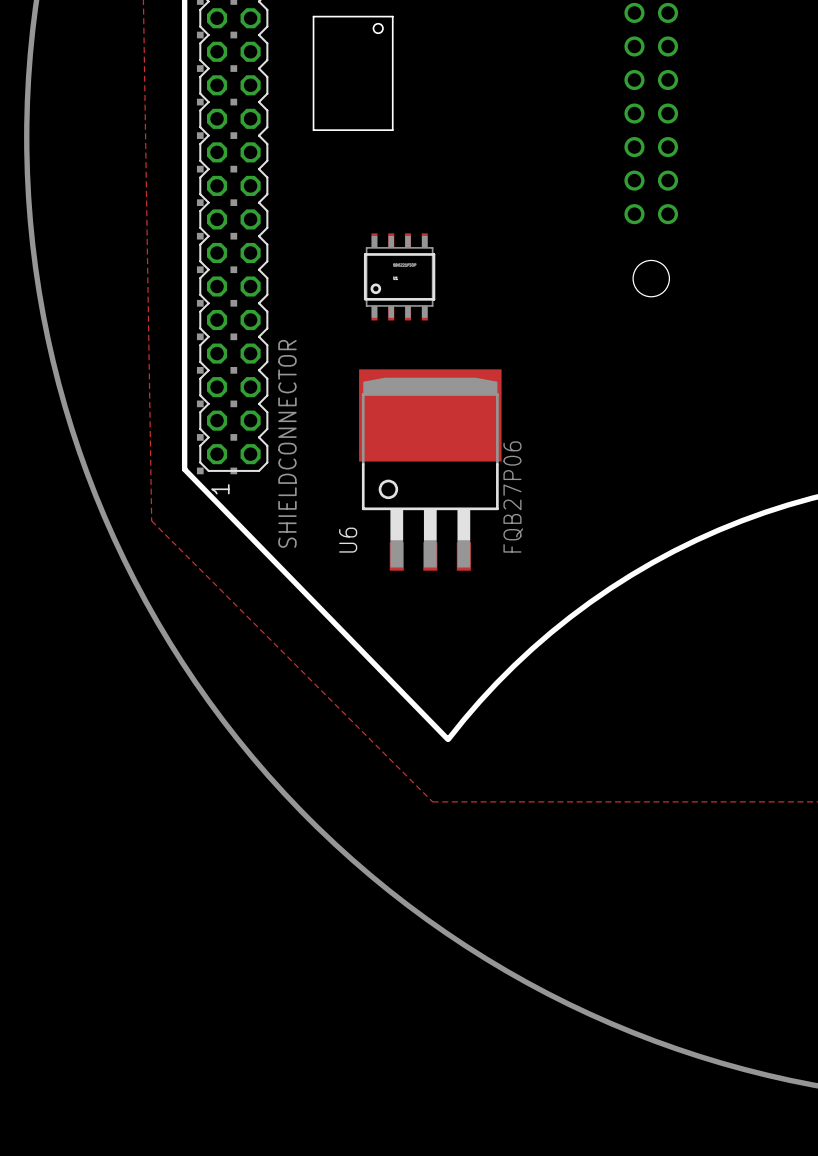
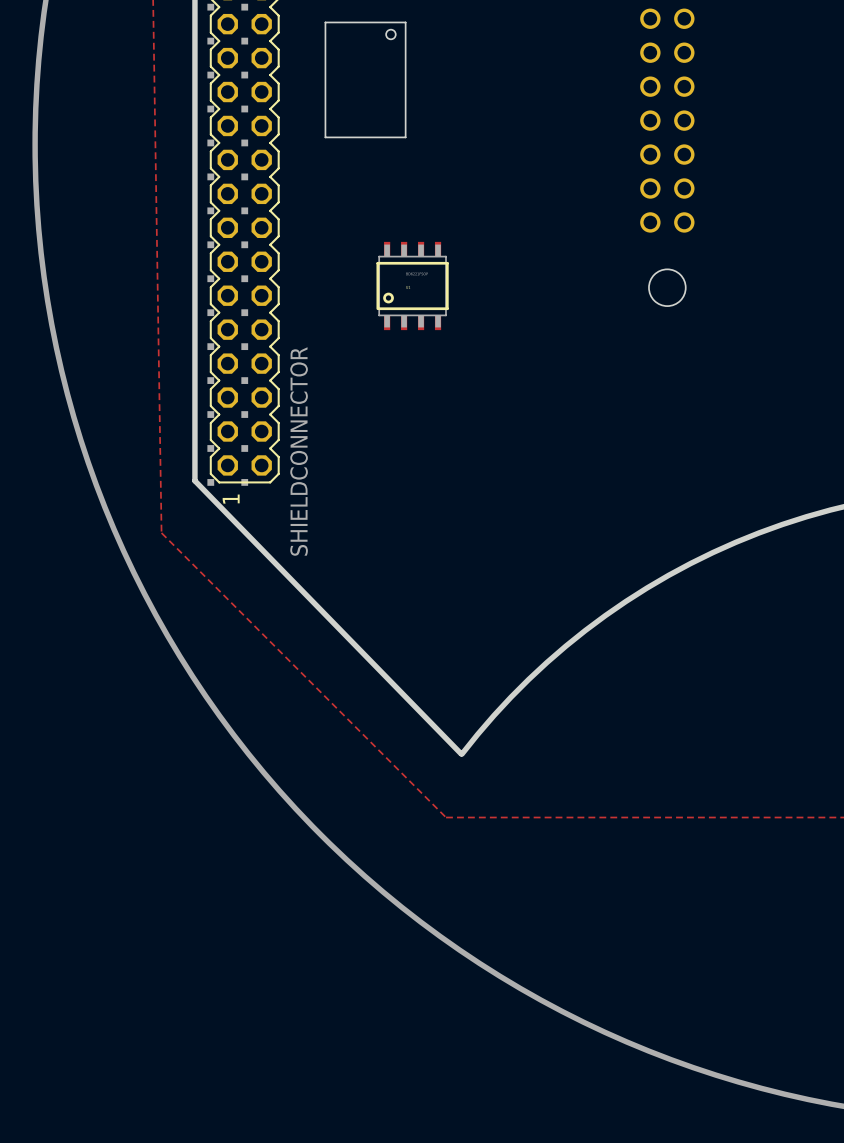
U6: FQB27P06 (430, 470) -> none

